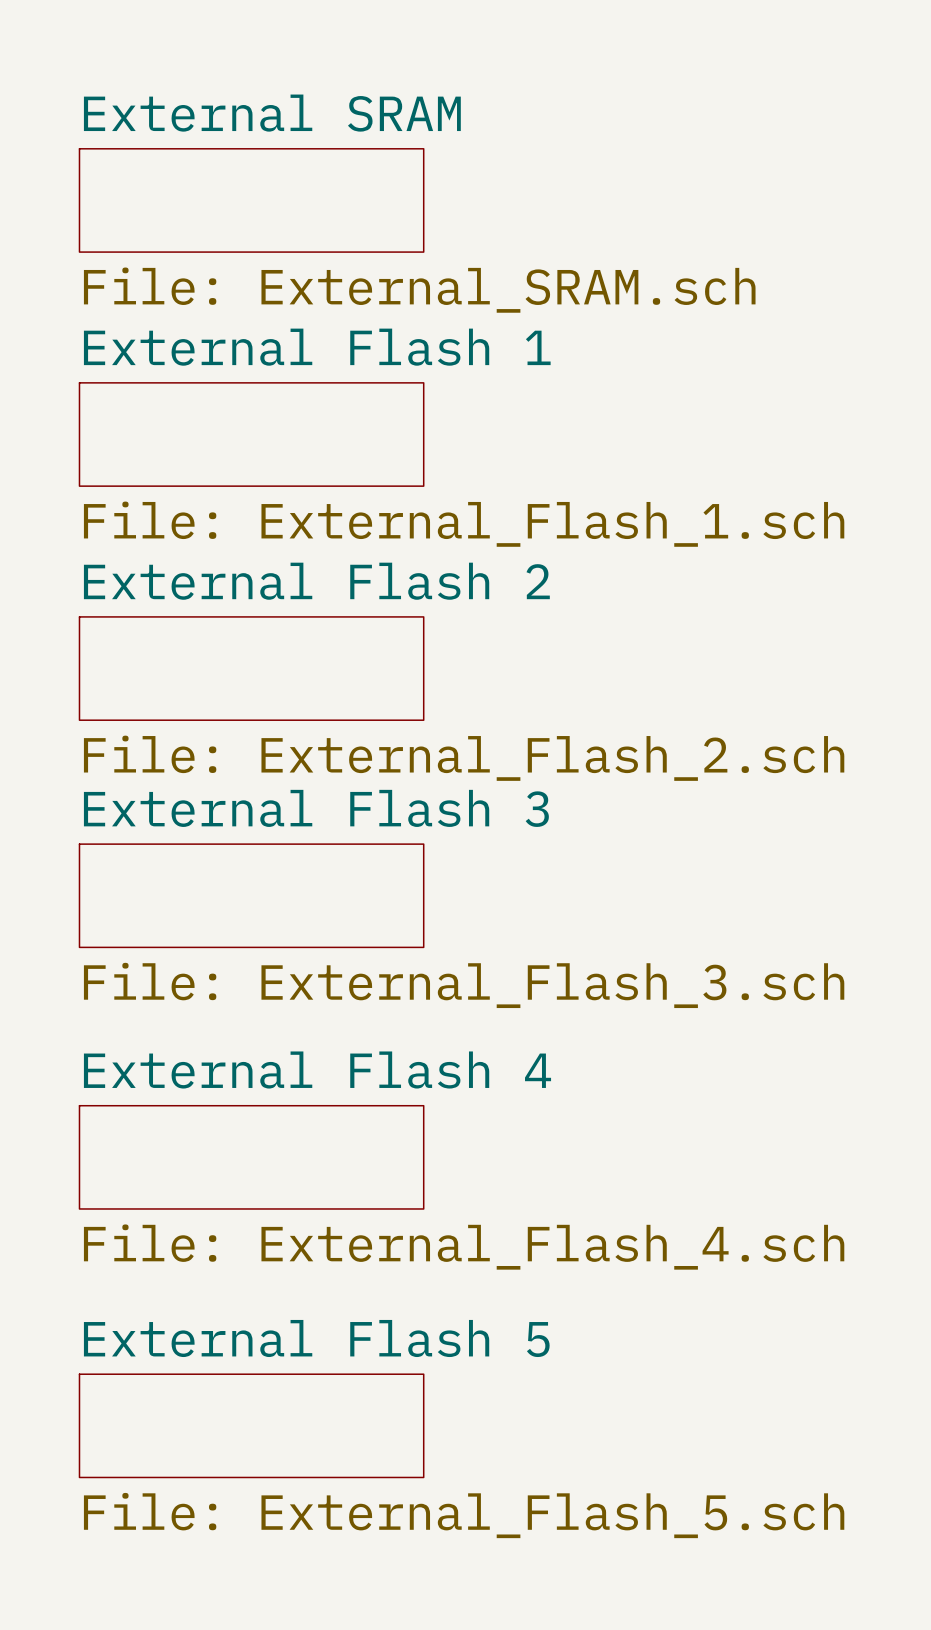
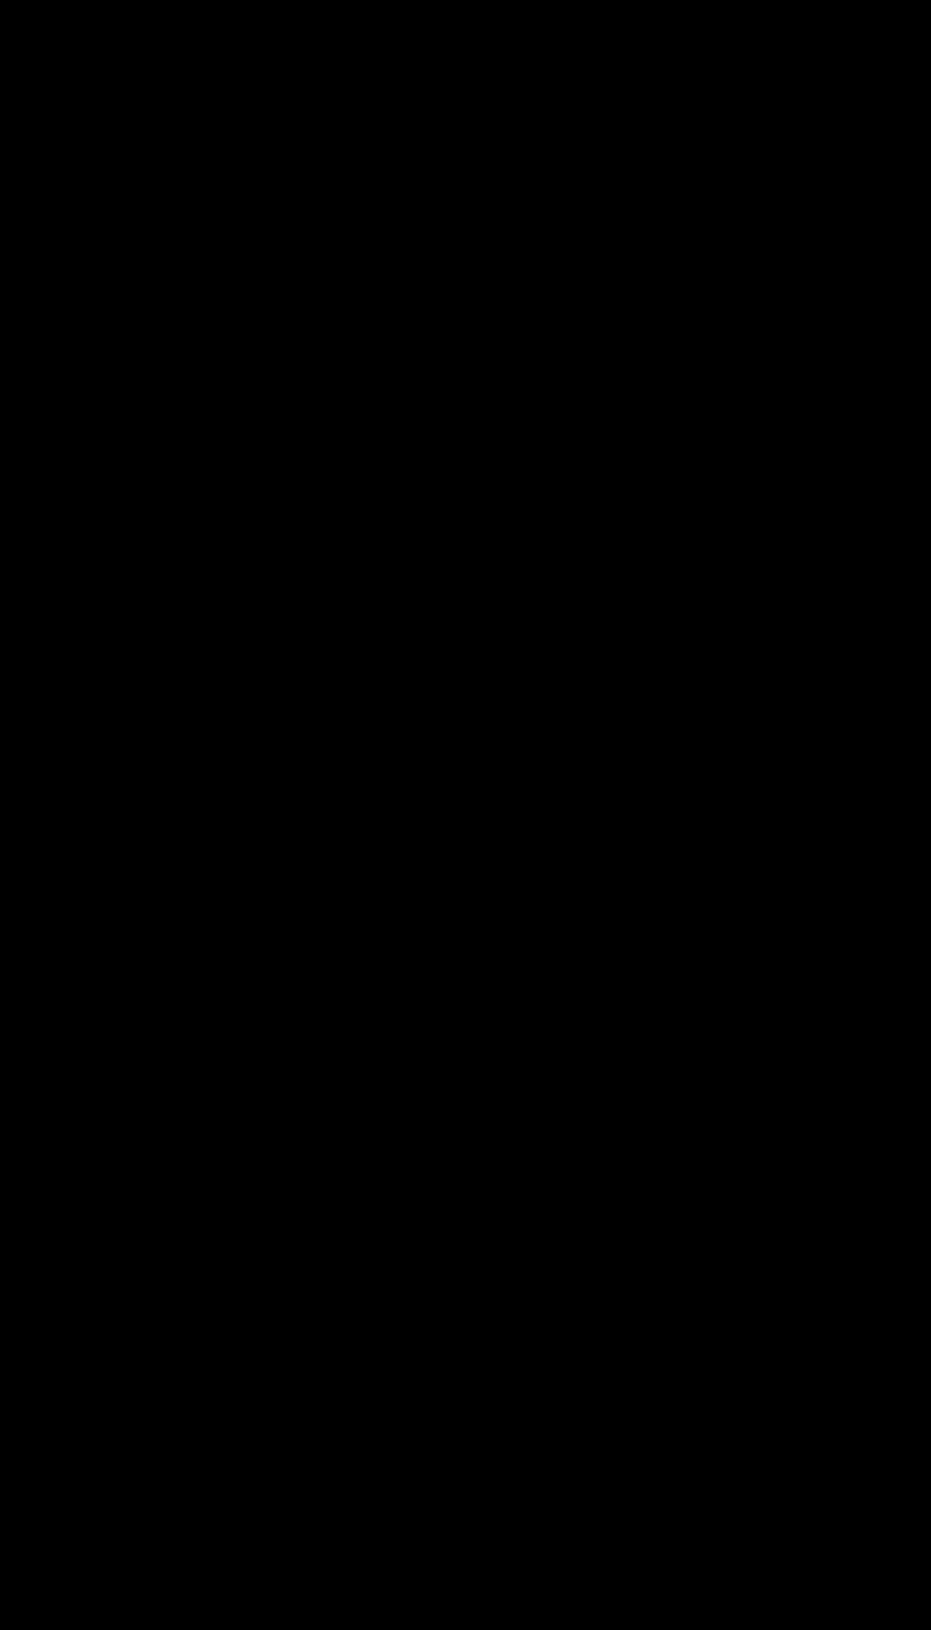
sheet External SRAM: File: External_SRAM.sch (251, 200) -> none
sheet External Flash 1: File: External_Flash_1.sch (251, 434) -> none
sheet External Flash 2: File: External_Flash_2.sch (251, 668) -> none
sheet External Flash 3: File: External_Flash_3.sch (251, 895) -> none
sheet External Flash 4: File: External_Flash_4.sch (251, 1157) -> none
sheet External Flash 5: File: External_Flash_5.sch (251, 1425) -> none

